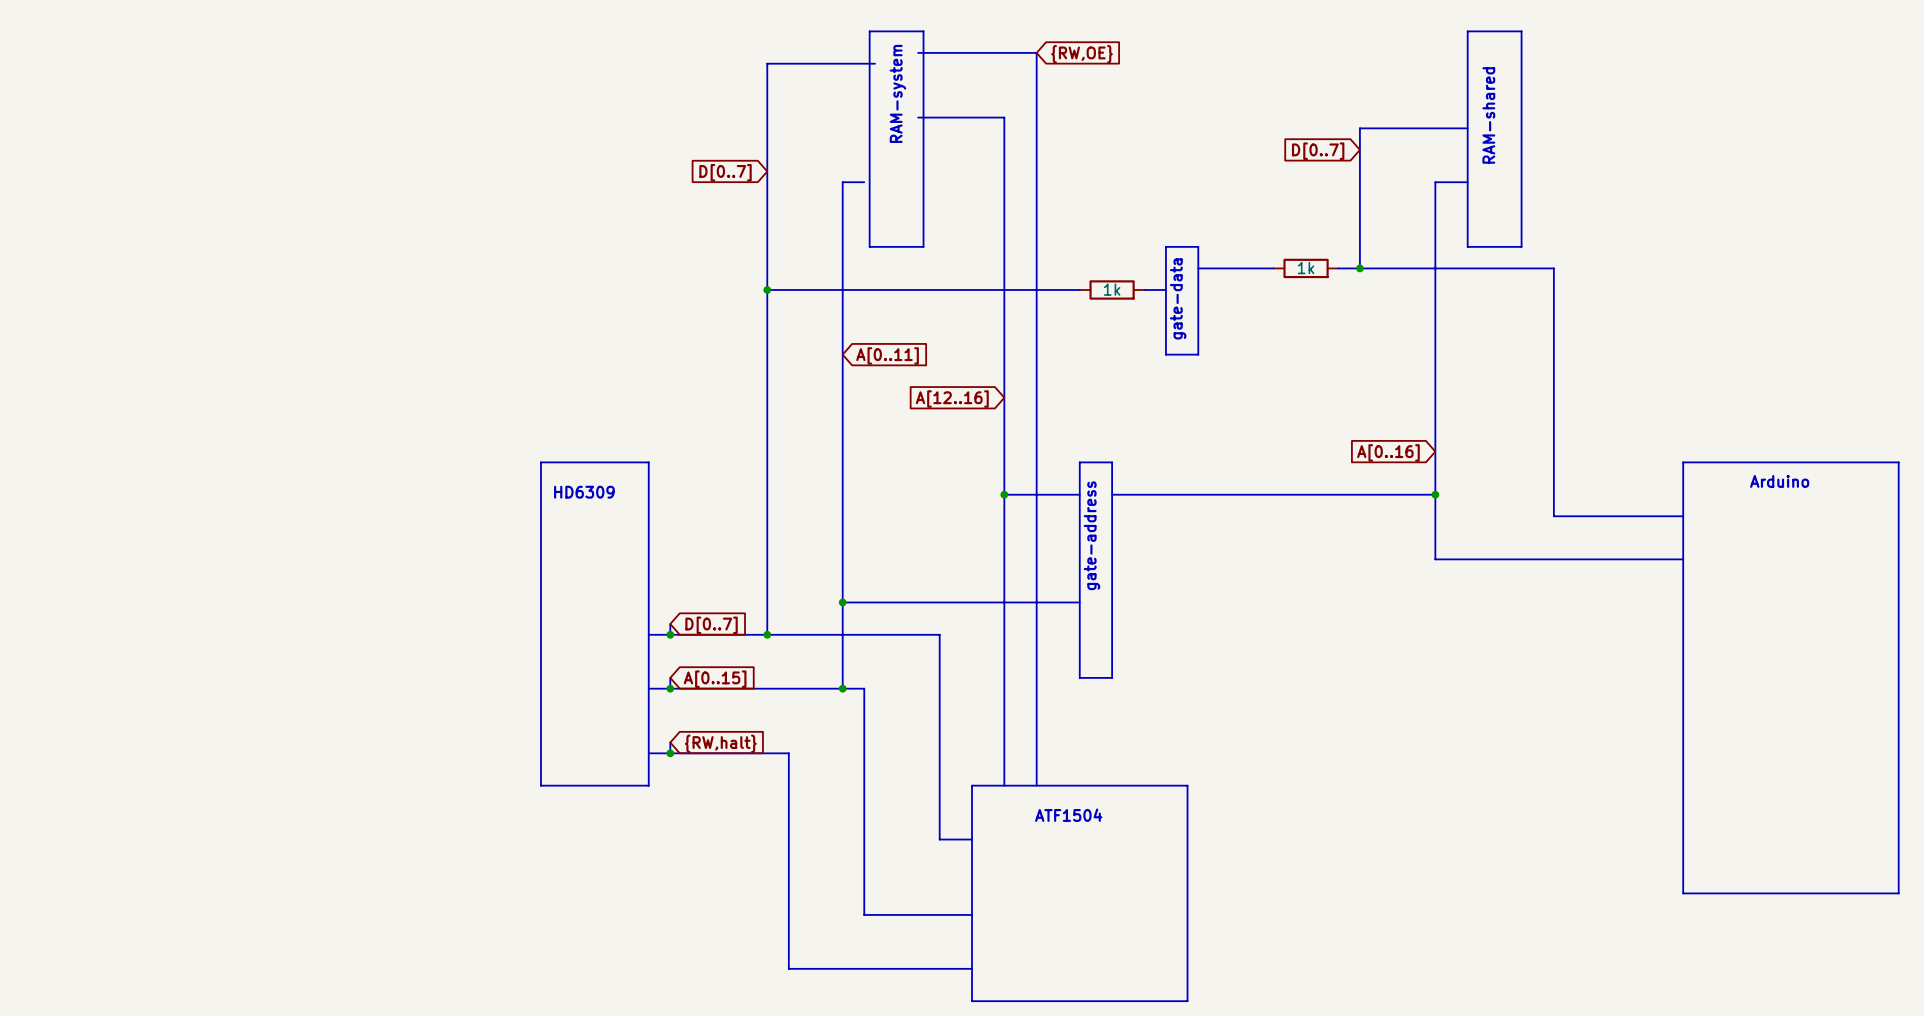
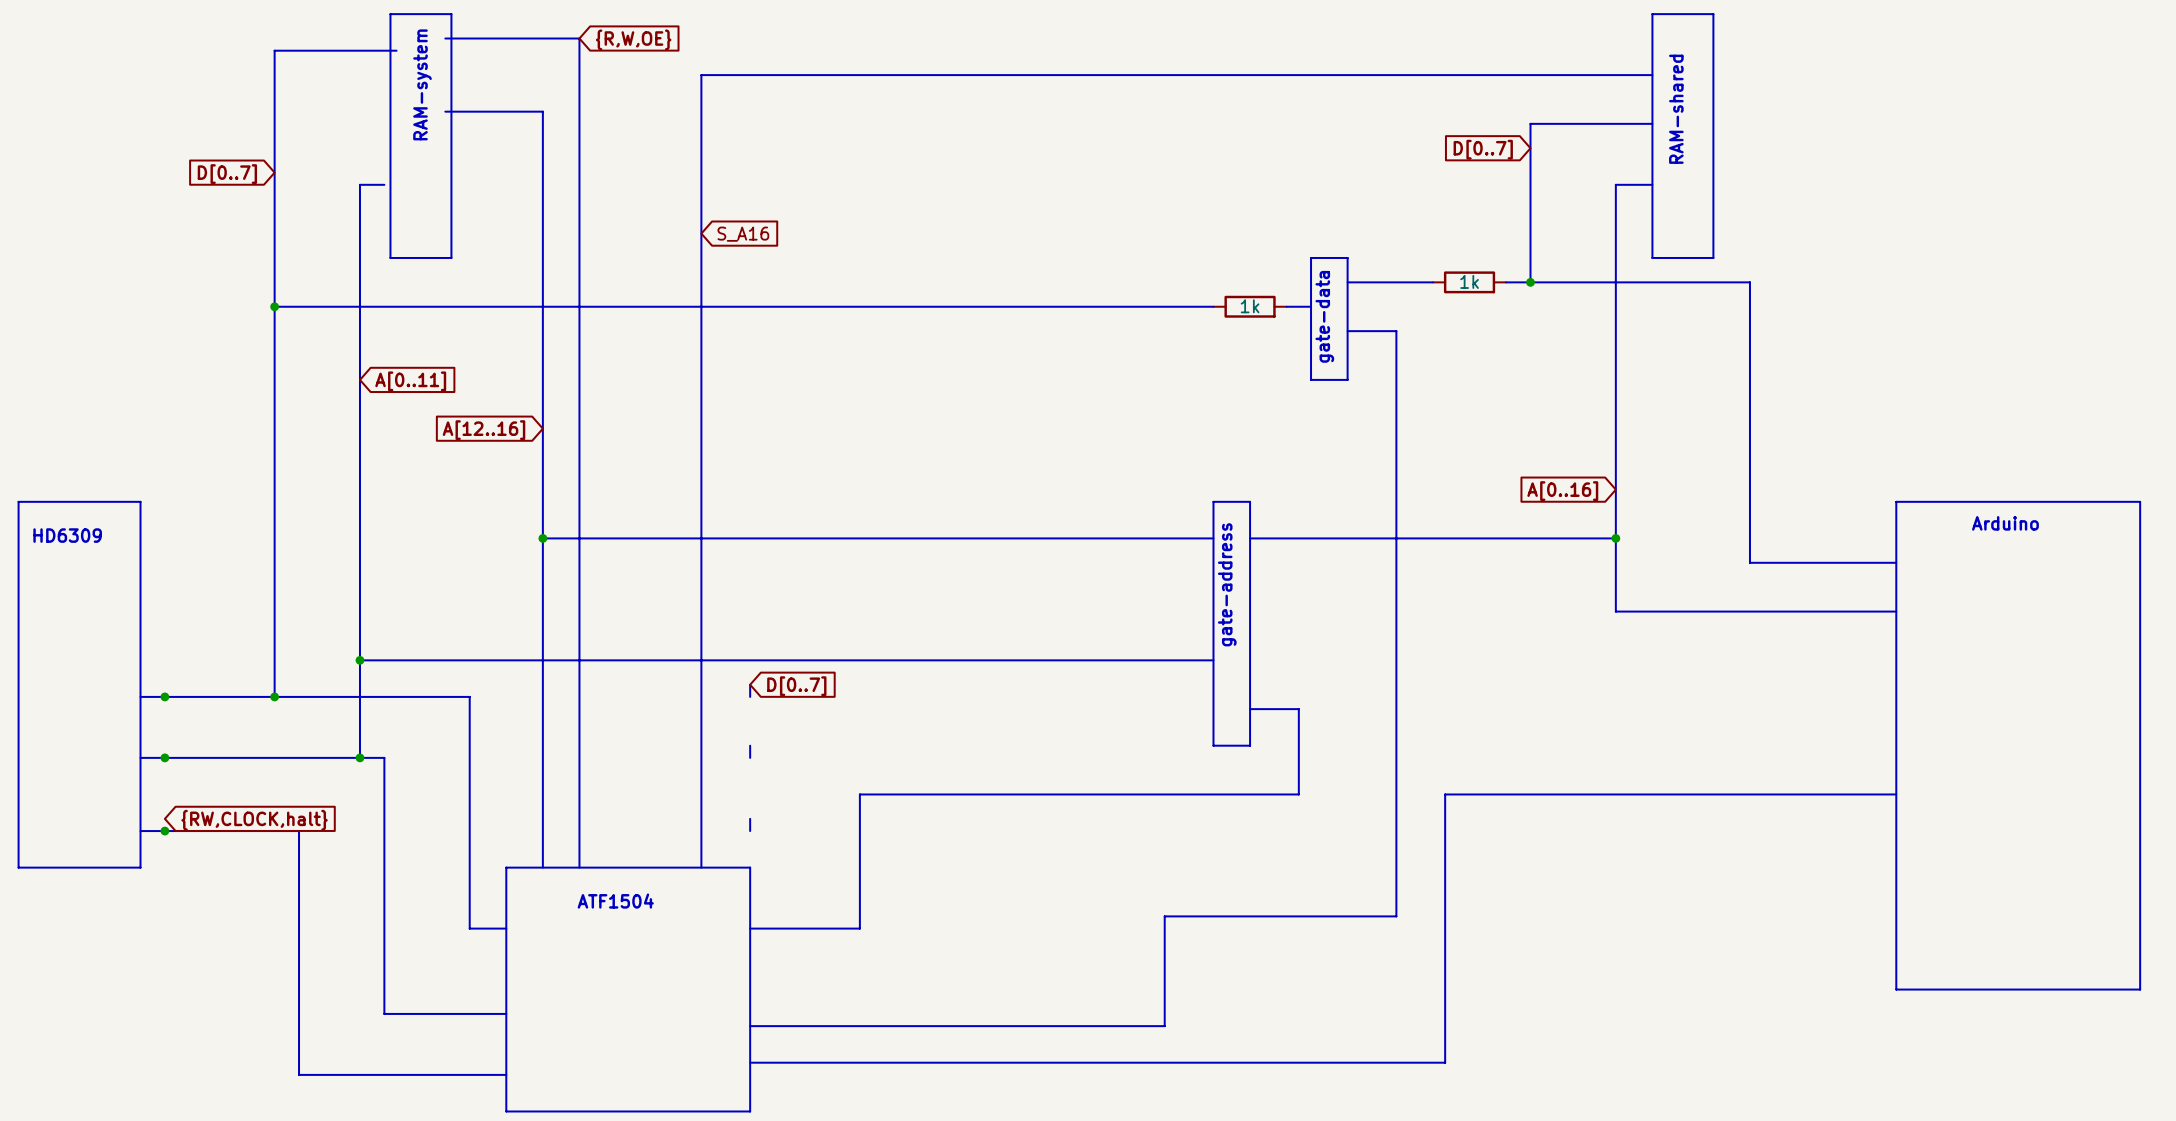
line: none -> (390, 14) (451, 14) (451, 257) (390, 257) (390, 14)
line: (869, 31) (923, 31) (923, 246) (869, 246) (869, 31) -> none
bus: none -> (445, 38) (579, 38) (579, 867)
bus: (918, 52) (1036, 52) (1036, 785) -> none
global label: none -> {R,W,OE} (633, 39)
global label: {RW,OE} (1082, 54) -> none
bus: none -> (396, 50) (274, 50) (274, 696)
bus: (875, 63) (767, 63) (767, 634) -> none
bus: none -> (1652, 75) (701, 75) (701, 867)
text: none -> RAM-system (422, 84)
text: RAM-system (897, 93) -> none
bus: none -> (445, 111) (542, 111) (542, 867)
bus: (918, 117) (1004, 117) (1004, 785) -> none
global label: none -> D[0..7] (227, 174)
global label: D[0..7] (725, 172) -> none
bus: none -> (384, 184) (359, 184) (359, 757)
bus: (864, 182) (842, 182) (842, 688) -> none
global label: none -> S_A16 (743, 234)
bus: none -> (274, 306) (859, 306)
junction: none -> (274, 306)
junction: (767, 289) -> none
bus: none -> (1347, 331) (1396, 331) (1396, 916) (1164, 916) (1164, 1026) (750, 1026)
global label: none -> A[0..11] (410, 381)
global label: A[0..11] (887, 355) -> none
global label: none -> A[12..16] (484, 430)
global label: A[12..16] (952, 399) -> none
line: none -> (18, 501) (140, 501) (140, 867) (18, 867) (18, 501)
text: none -> HD6309 (67, 535)
text: HD6309 (584, 492) -> none
bus: none -> (542, 538) (1128, 538)
junction: none -> (542, 538)
junction: (1004, 494) -> none
bus: none -> (359, 660) (945, 660)
junction: none -> (359, 660)
junction: (842, 602) -> none
bus: none -> (140, 696) (469, 696) (469, 928) (506, 928)
junction: none -> (164, 696)
junction: none -> (274, 696)
bus: (648, 634) (939, 634) (939, 839) (972, 839) -> none
junction: (670, 634) -> none
junction: (767, 634) -> none
bus: none -> (1250, 709) (1298, 709) (1298, 794) (859, 794) (859, 928) (750, 928)
global label: A[0..15] (715, 679) -> none
bus: none -> (140, 757) (384, 757) (384, 1013) (506, 1013)
junction: none -> (164, 757)
junction: none -> (359, 757)
bus: (648, 688) (864, 688) (864, 914) (972, 914) -> none
junction: (670, 688) -> none
junction: (842, 688) -> none
bus: none -> (1896, 794) (1445, 794) (1445, 1062) (750, 1062)
global label: none -> {RW,CLOCK,halt} (254, 820)
global label: {RW,halt} (720, 743) -> none
bus: none -> (140, 831) (299, 831) (299, 1074) (506, 1074)
junction: none -> (164, 831)
bus: (648, 753) (788, 753) (788, 968) (972, 968) -> none
junction: (670, 753) -> none
line: (541, 785) (541, 462) (648, 462) (648, 785) -> (603, 867) (506, 867) (506, 1111) (750, 1111) (750, 867) (725, 867)
line: (972, 785) (1187, 785) (1187, 1001) (972, 1001) (972, 785) -> none
text: none -> ATF1504 (615, 901)
text: ATF1504 (1068, 815) -> none

